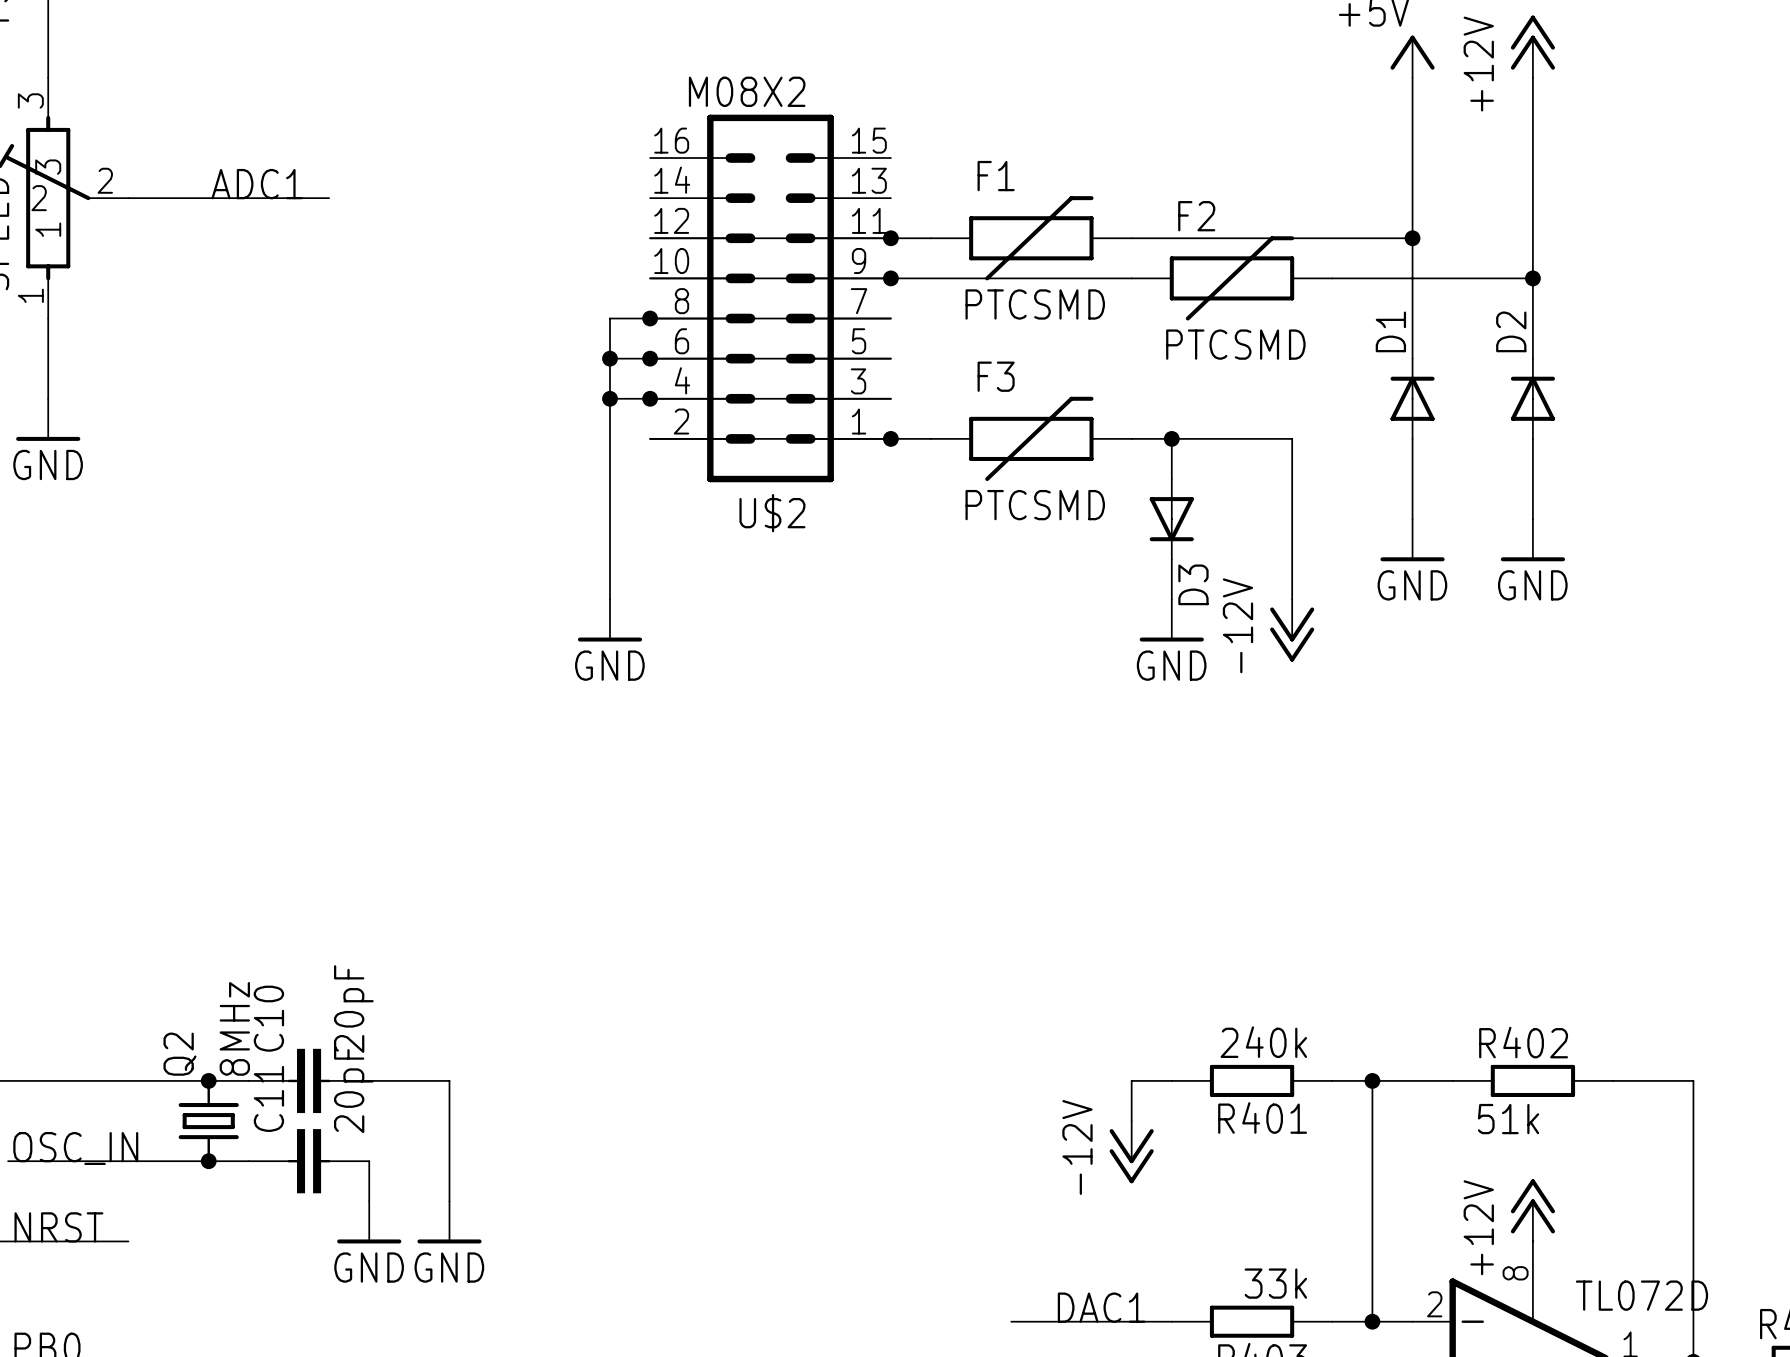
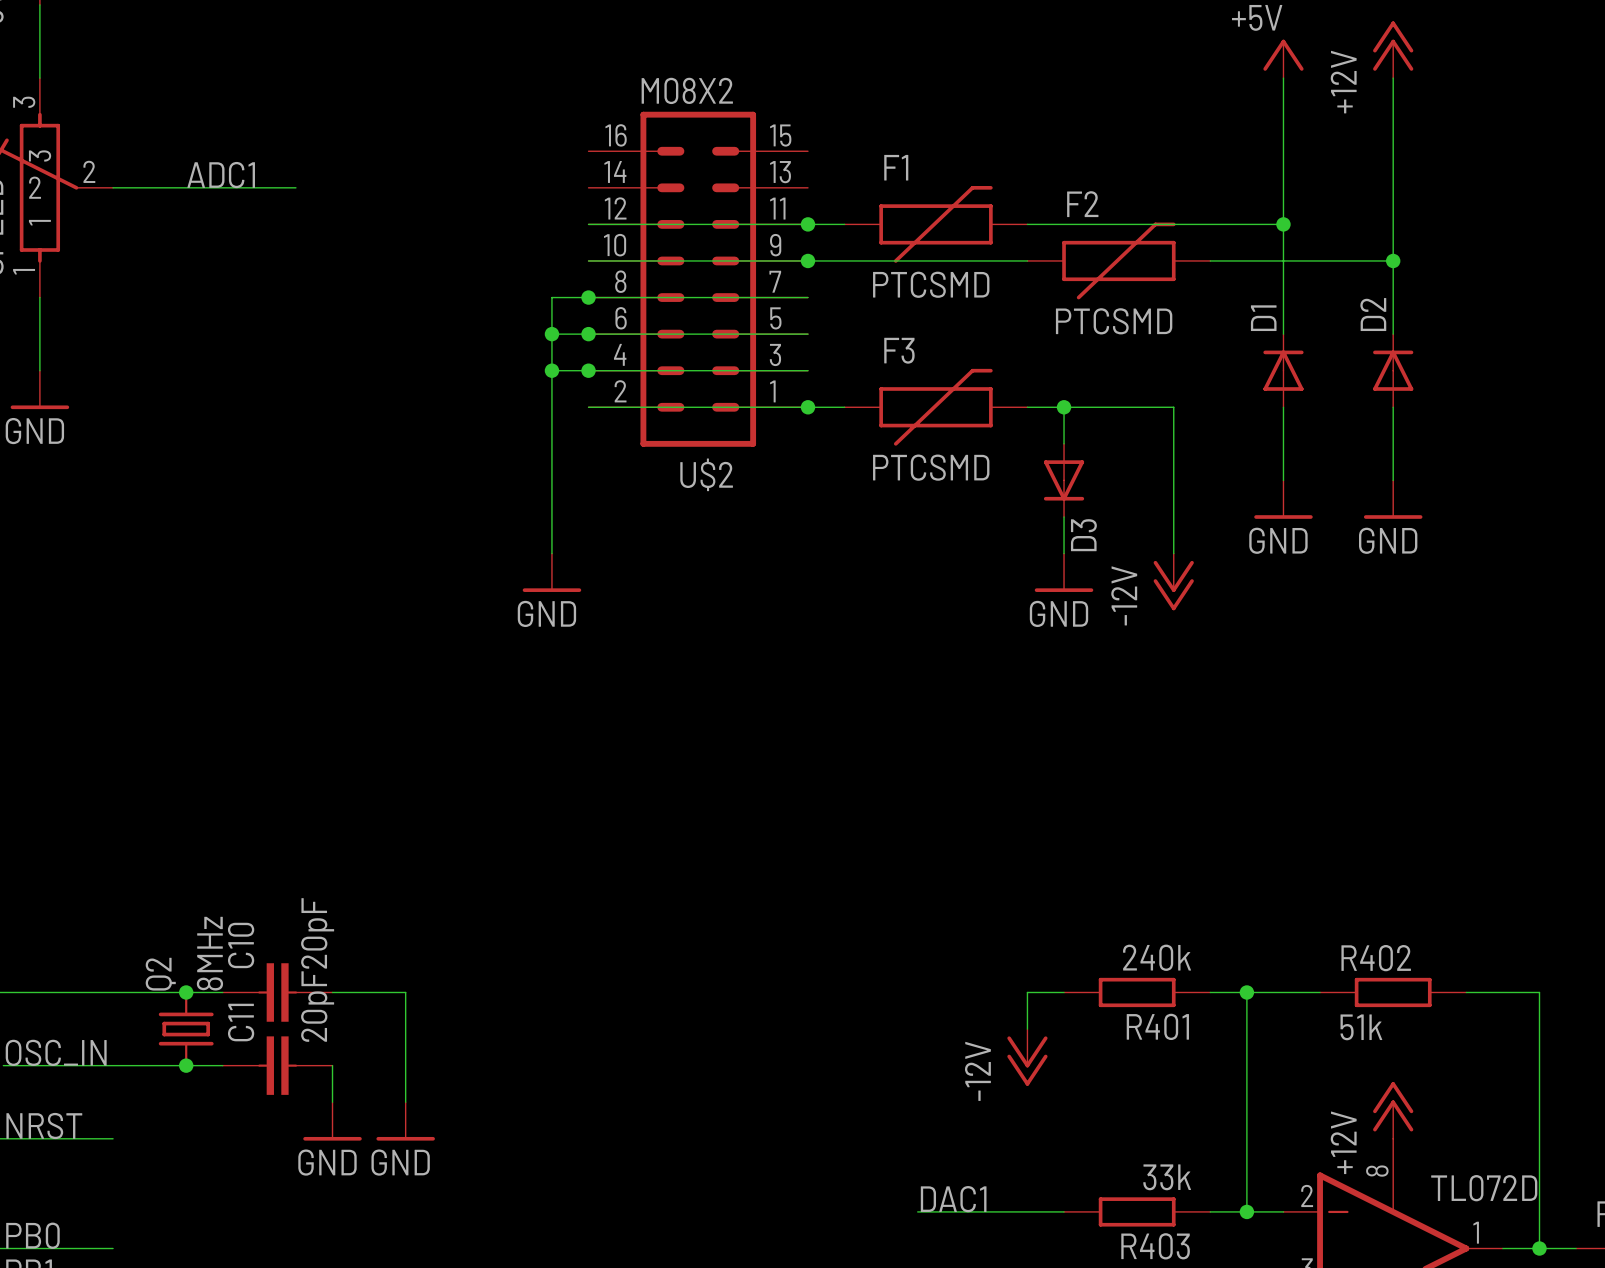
label position: DAC1 (1101, 1307) -> DAC1 (953, 1199)

